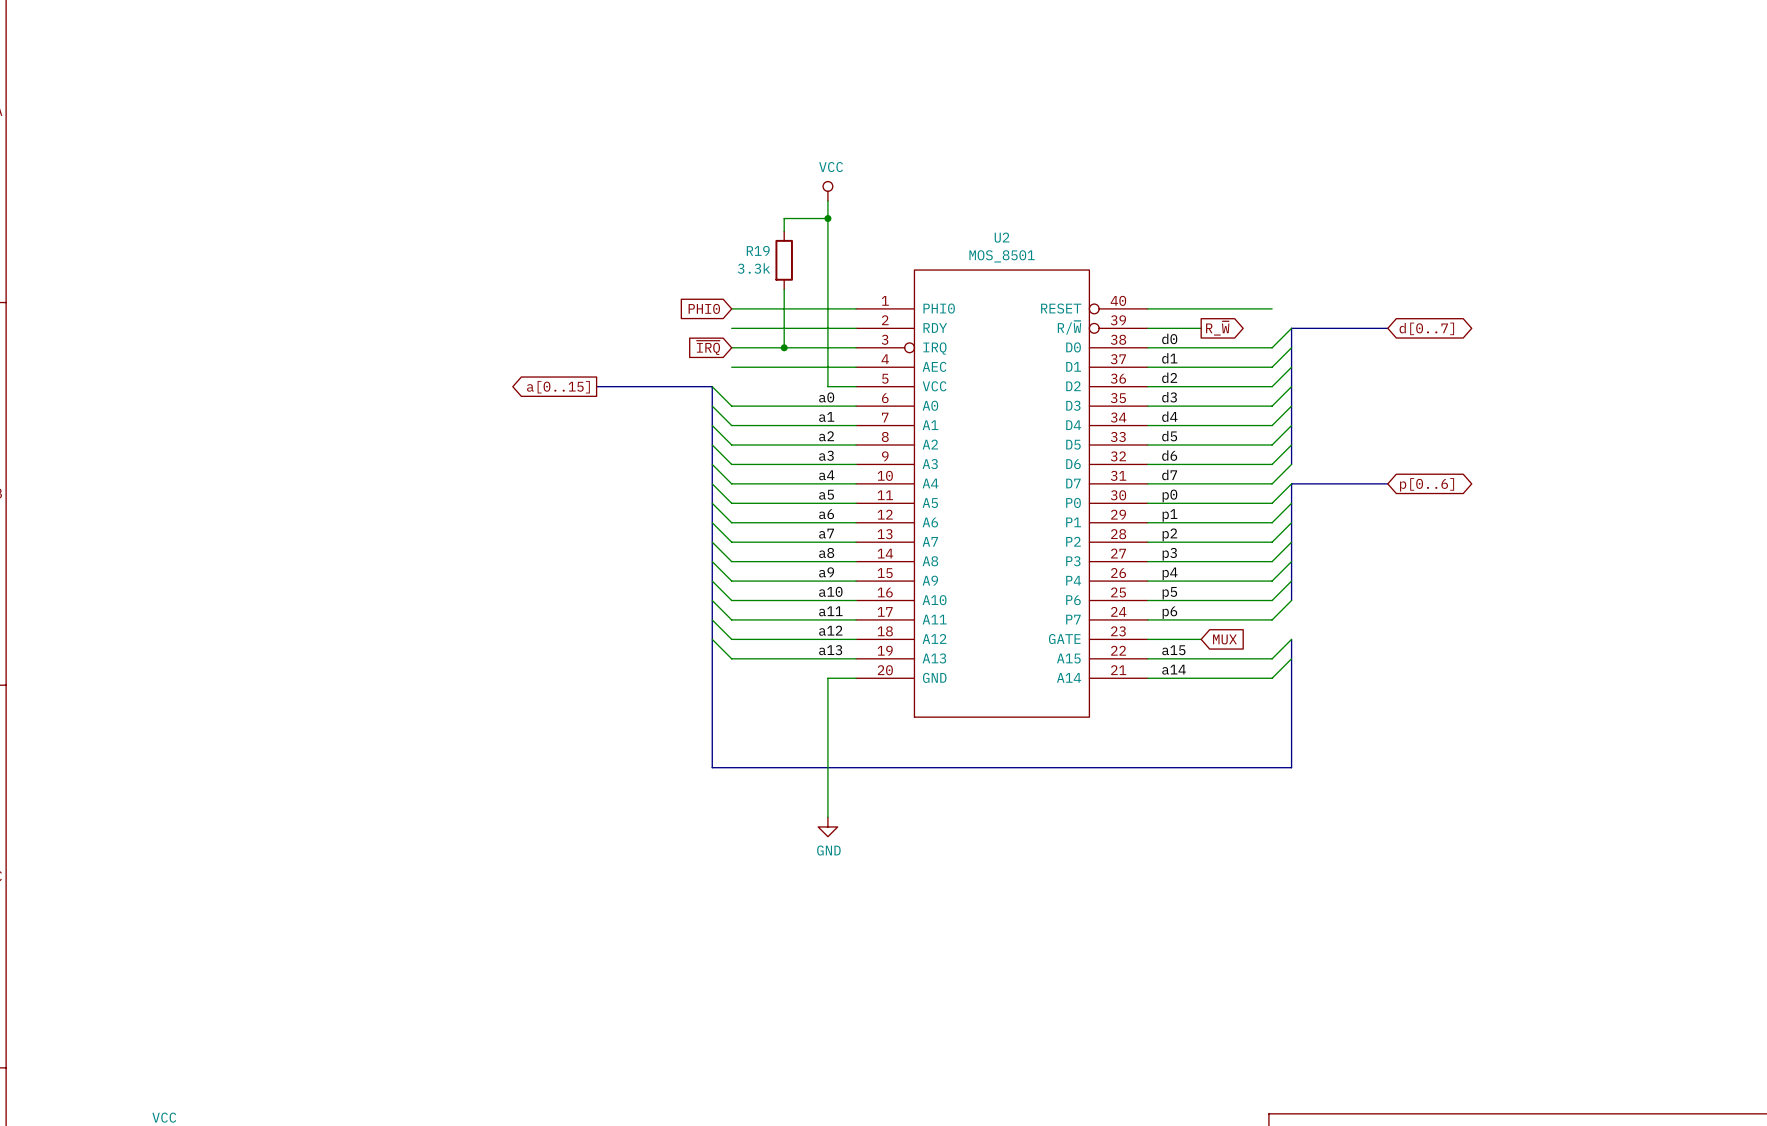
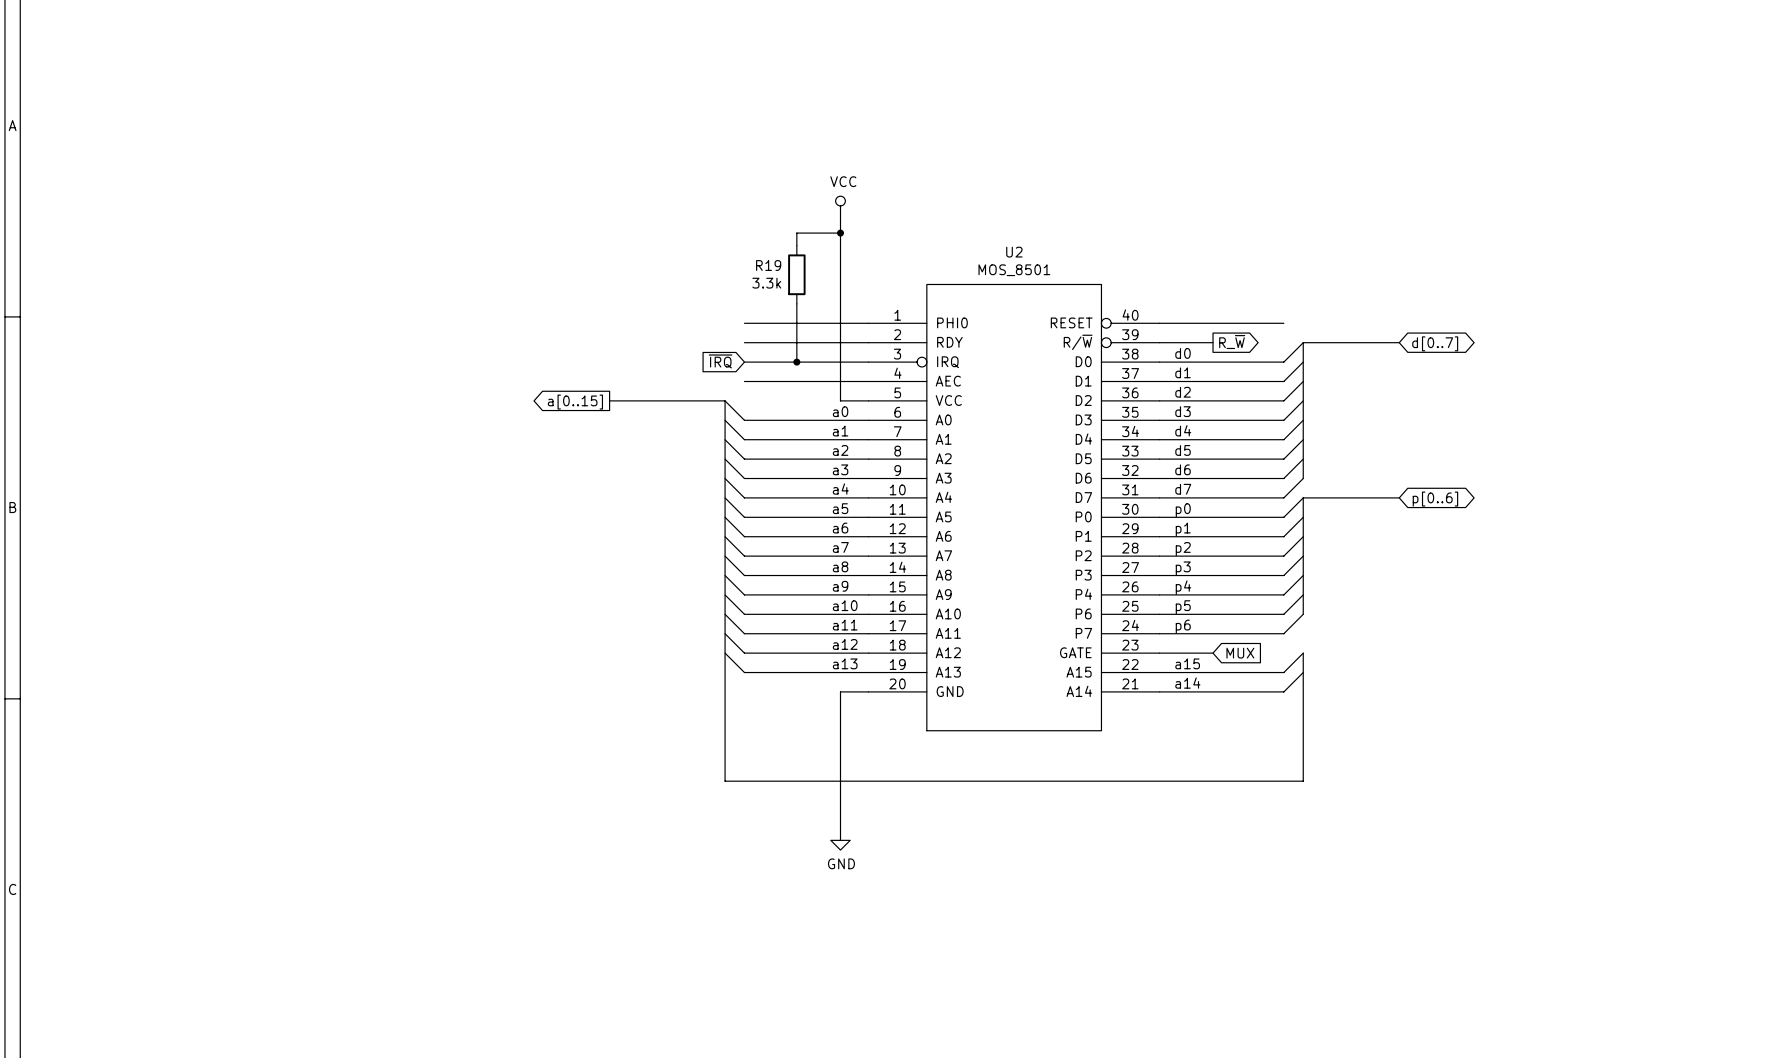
global label: PHI0 (704, 308) -> none

